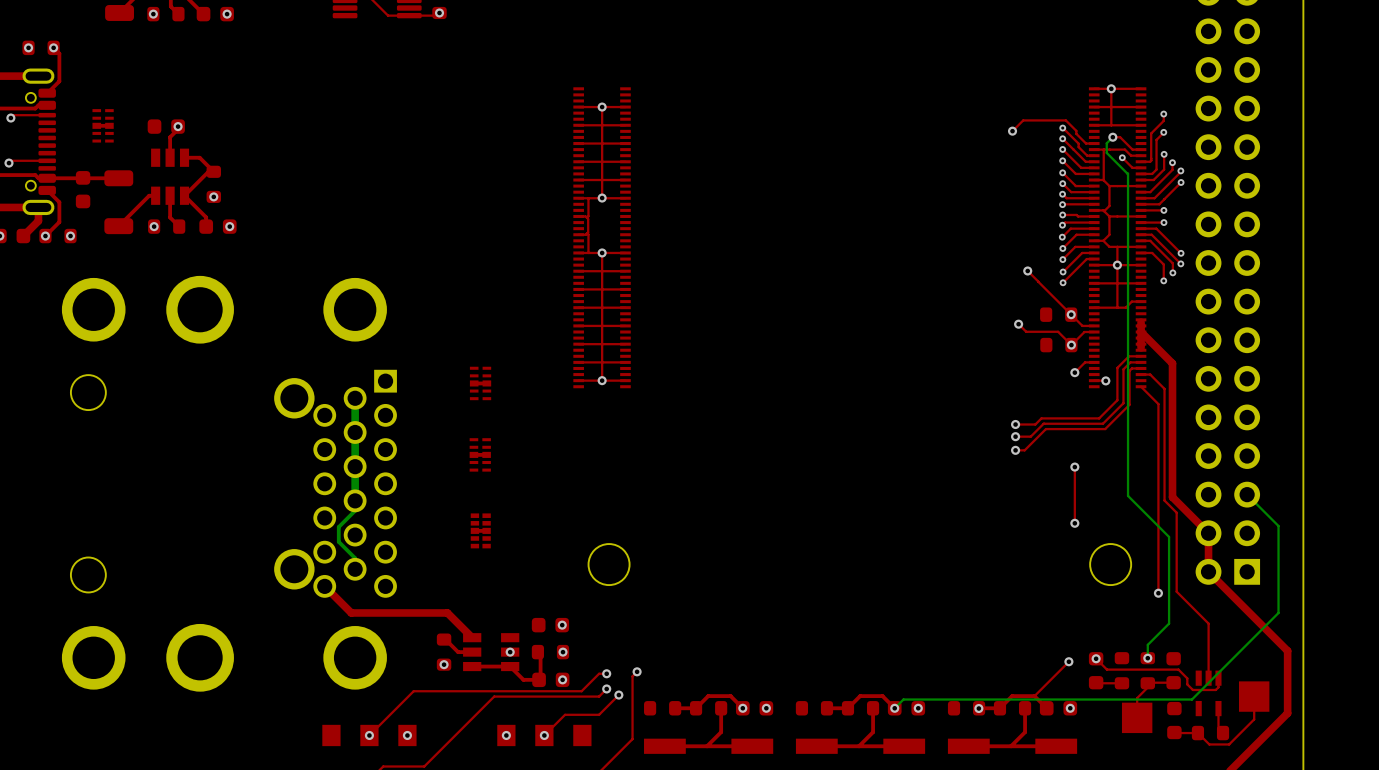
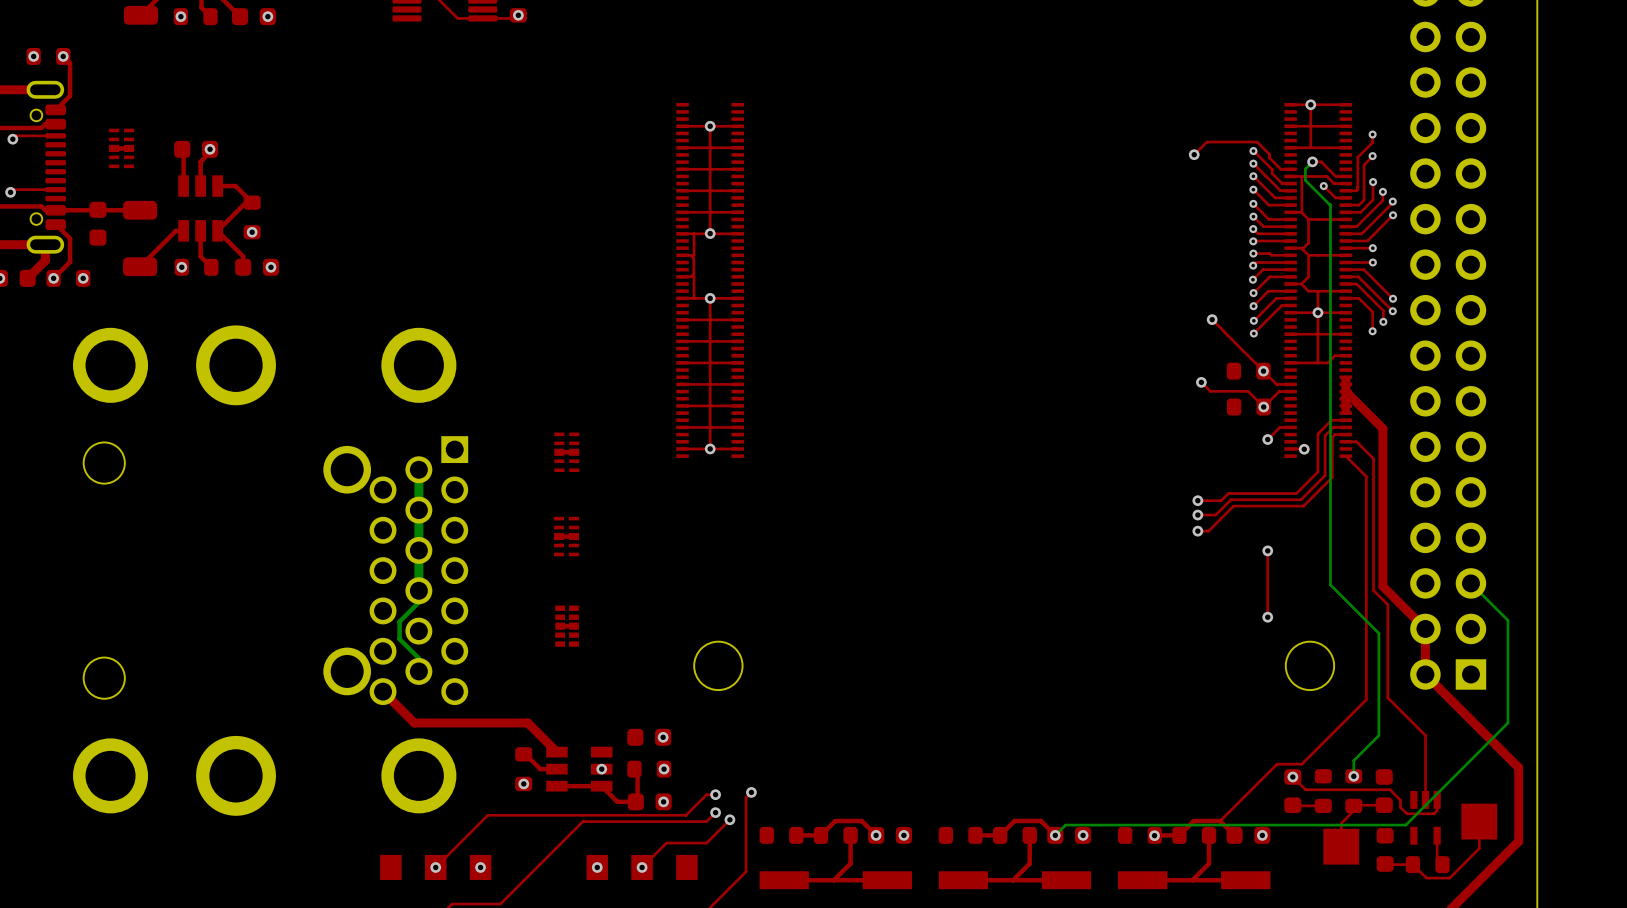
top track: none -> (183, 153) (183, 186)
top track: none -> (1366, 699) (1301, 764) (1277, 764) (1260, 780)
via: (1158, 593) -> none
via: (1068, 661) -> none

